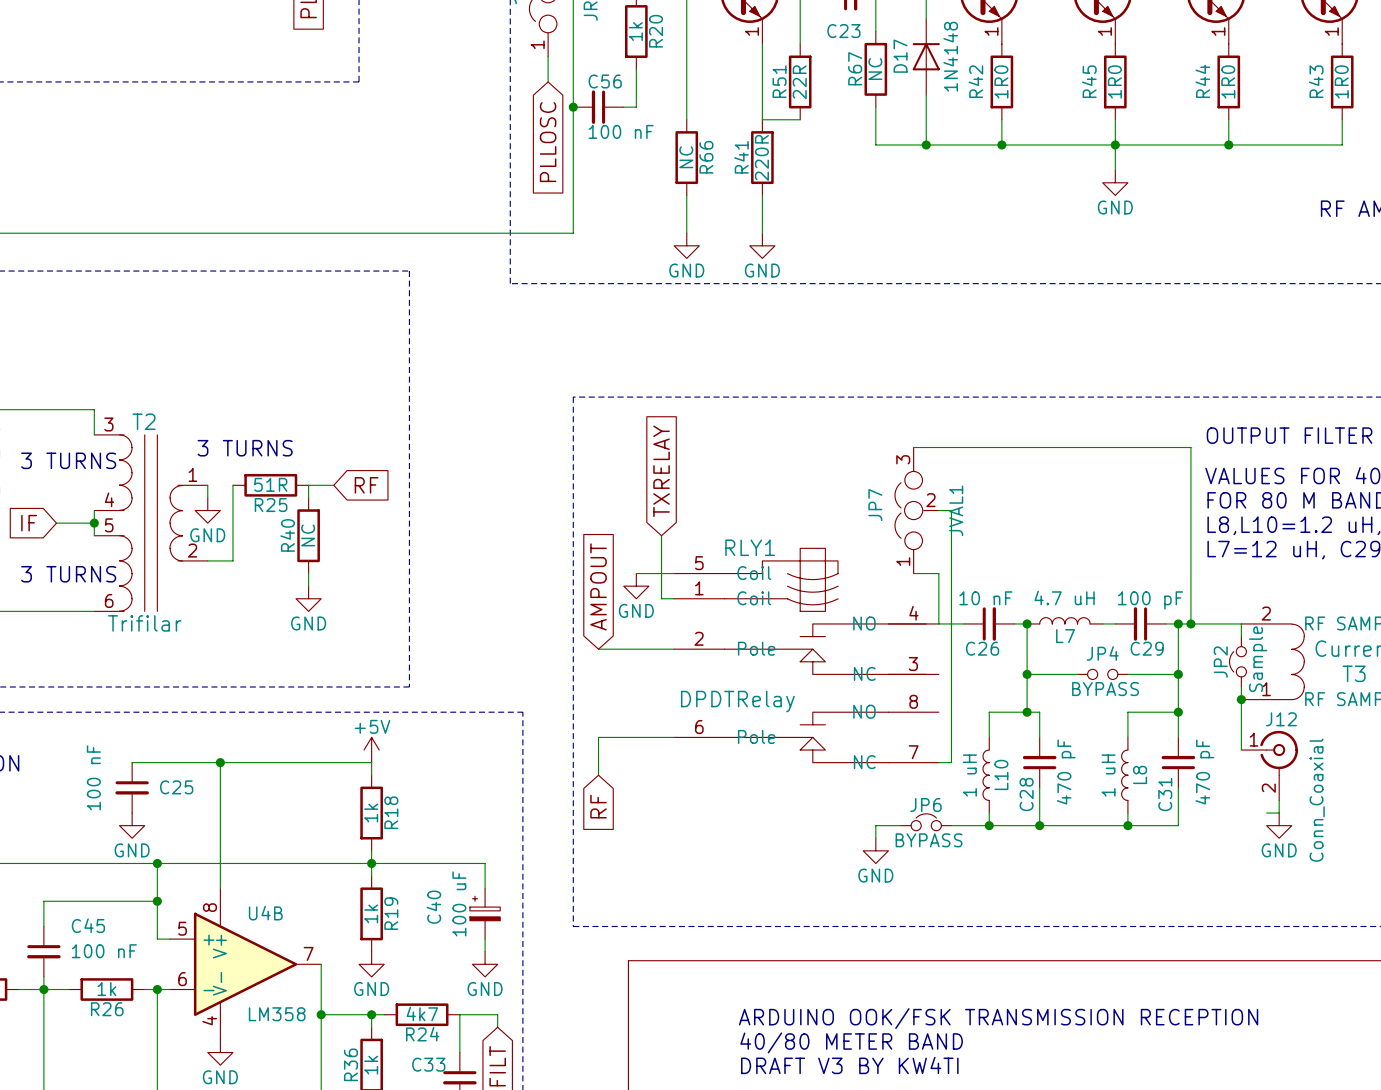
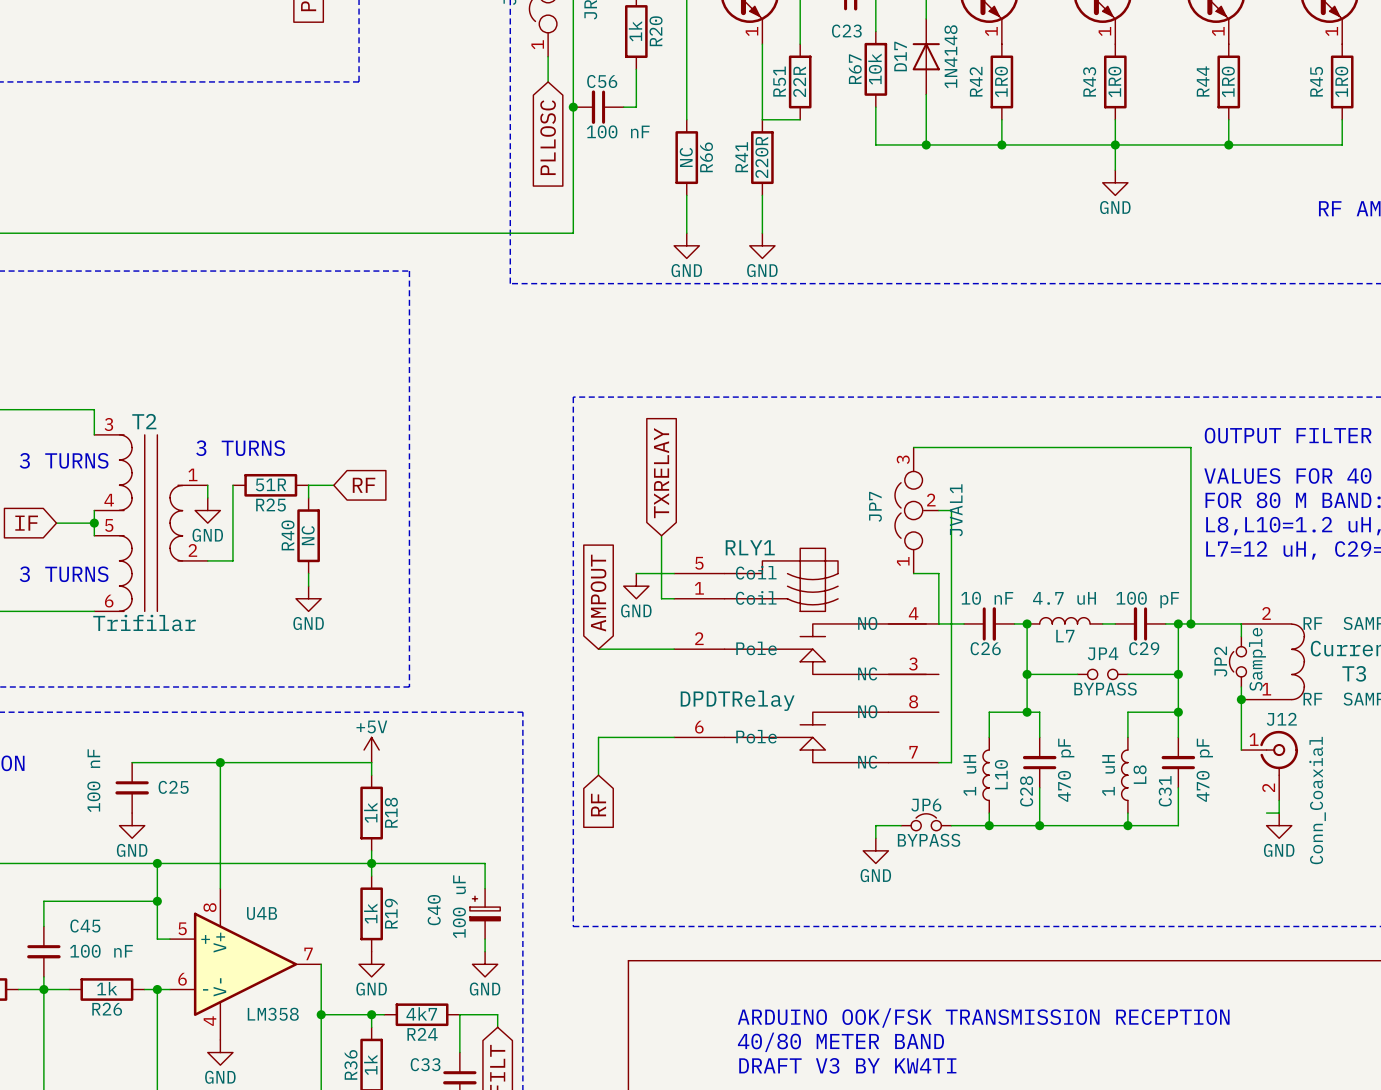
R67 value: NC (875, 69) -> 10k (875, 69)
R45 name: R45 (1089, 81) -> R43 (1089, 81)
R43 name: R43 (1316, 81) -> R45 (1316, 81)

